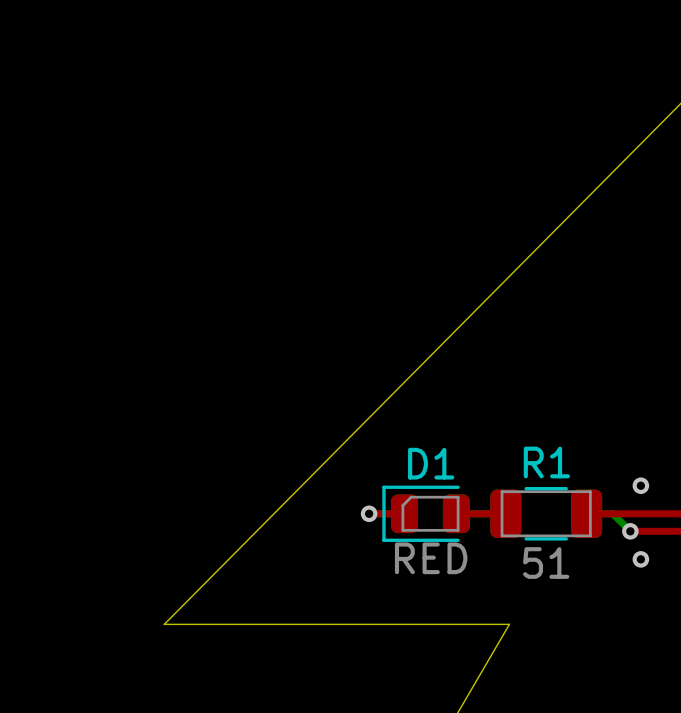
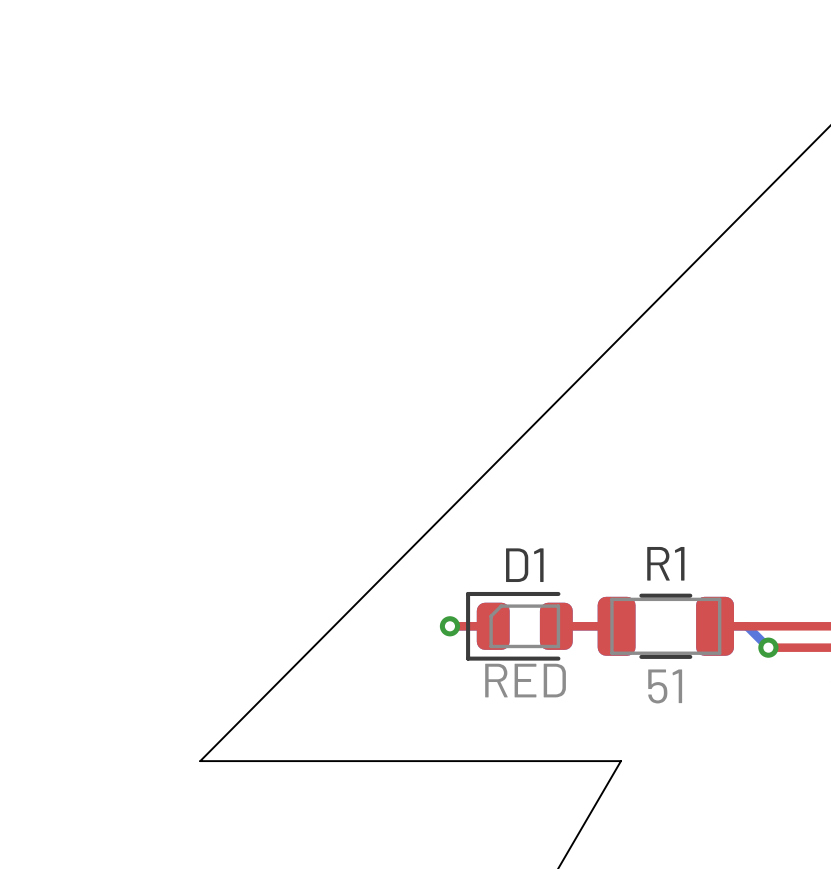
via: (640, 485) -> none
via: (640, 559) -> none

